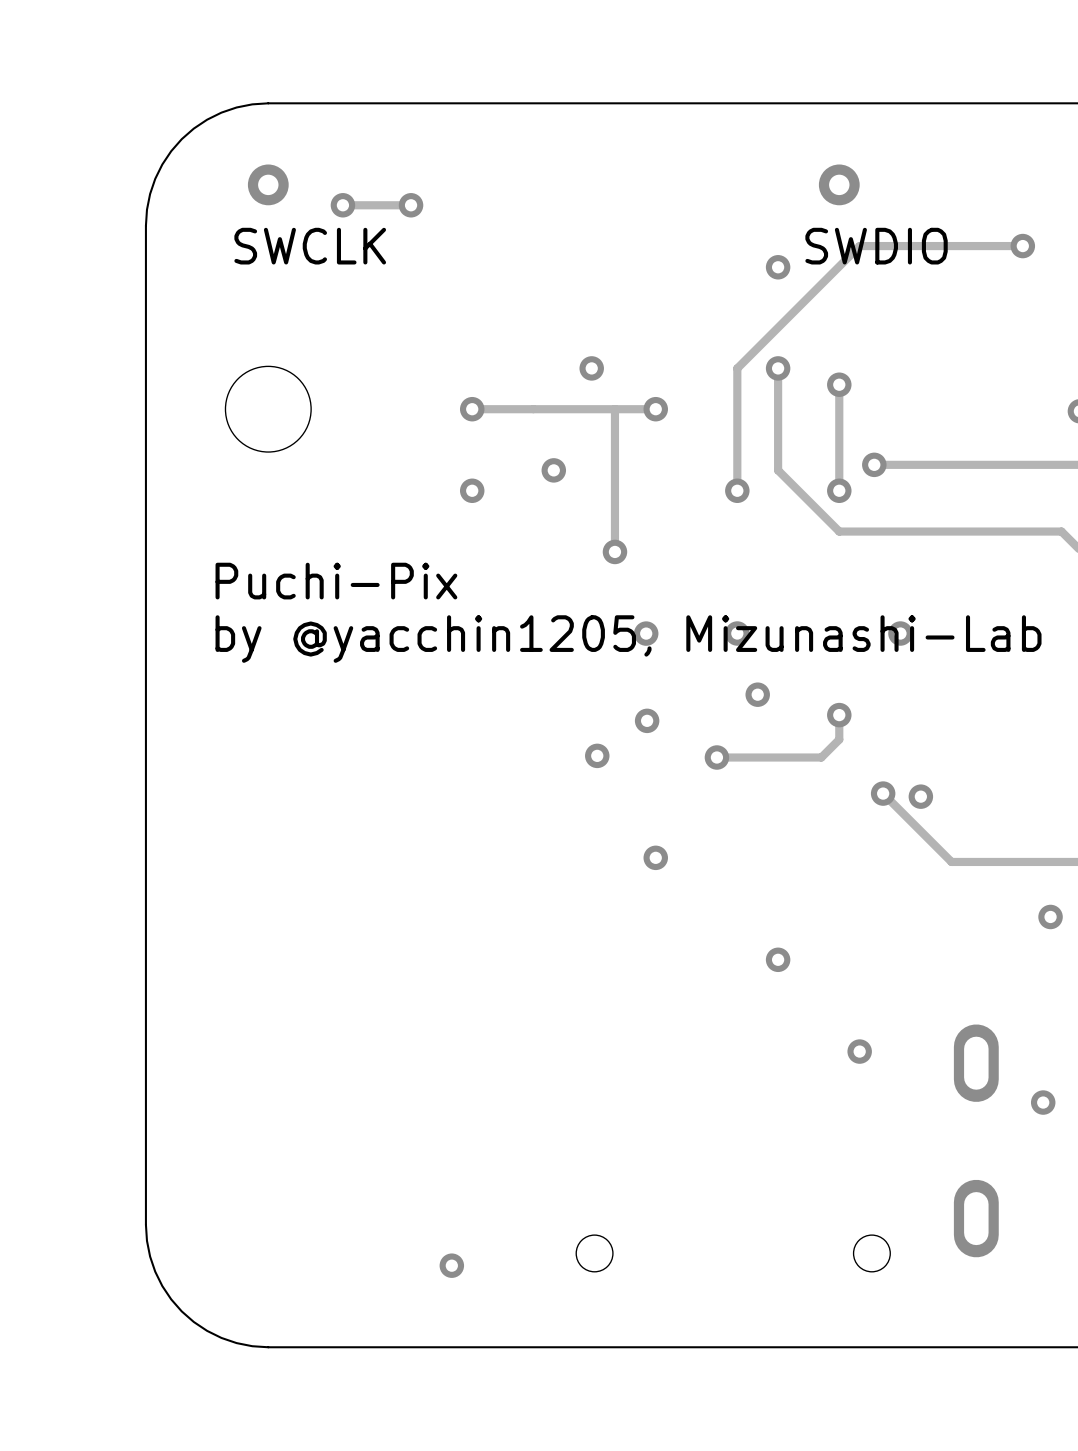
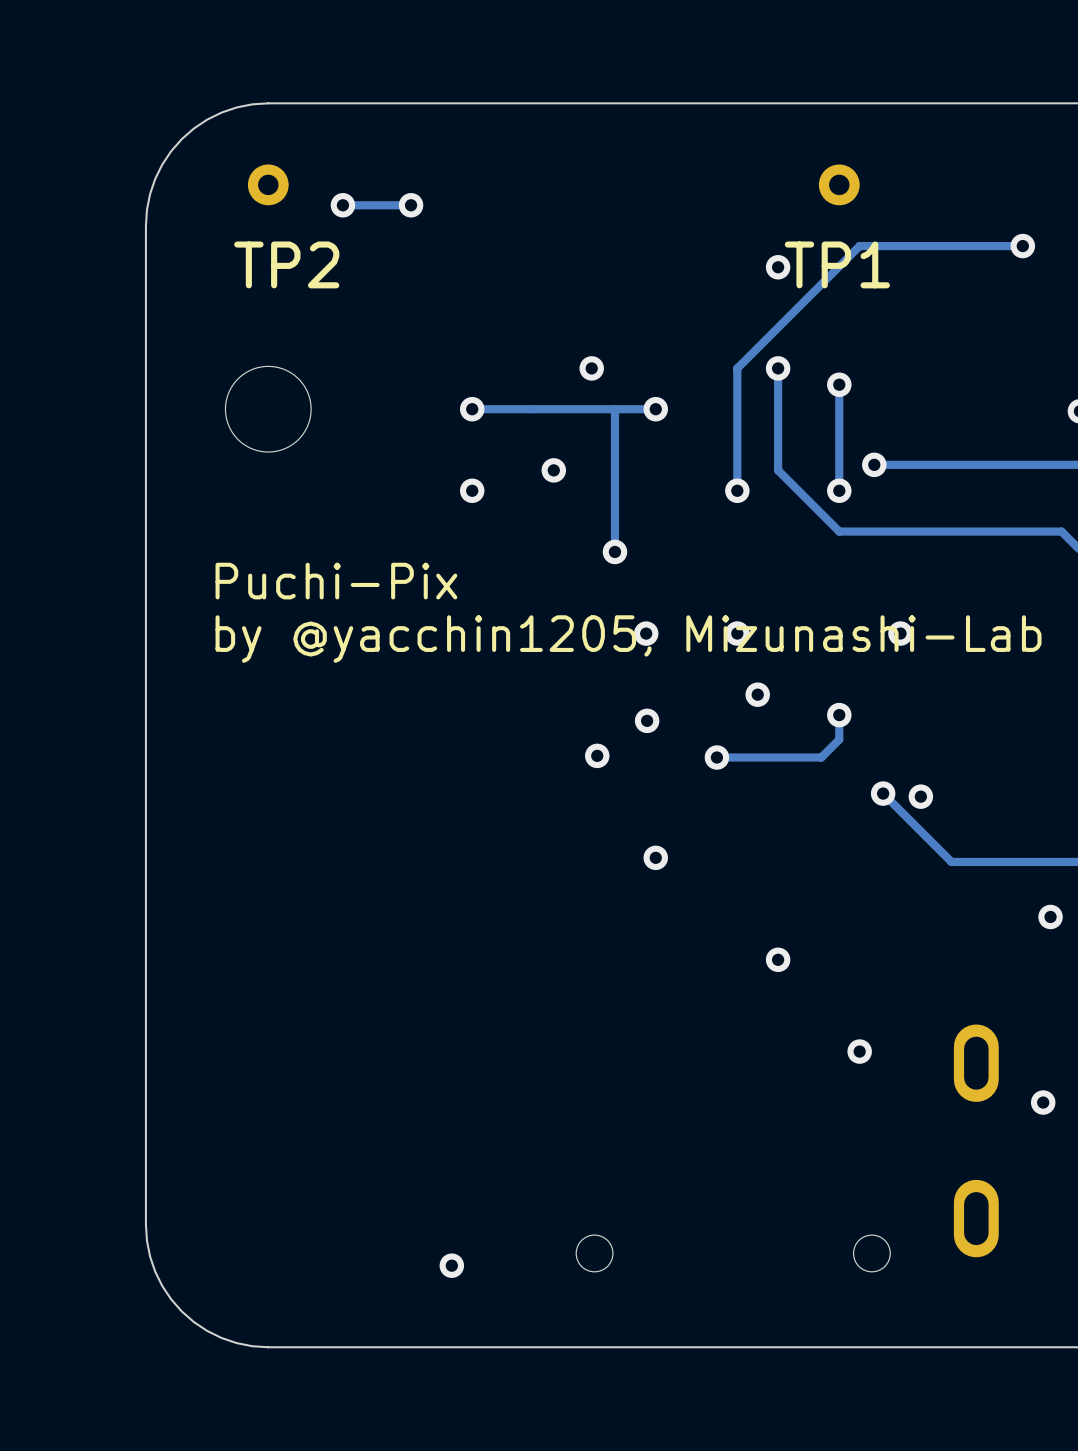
text: SWCLK (310, 246) -> none
text: SWDIO (876, 246) -> none
TP2 name: none -> TP2 (286, 264)
TP1 name: none -> TP1 (837, 264)

